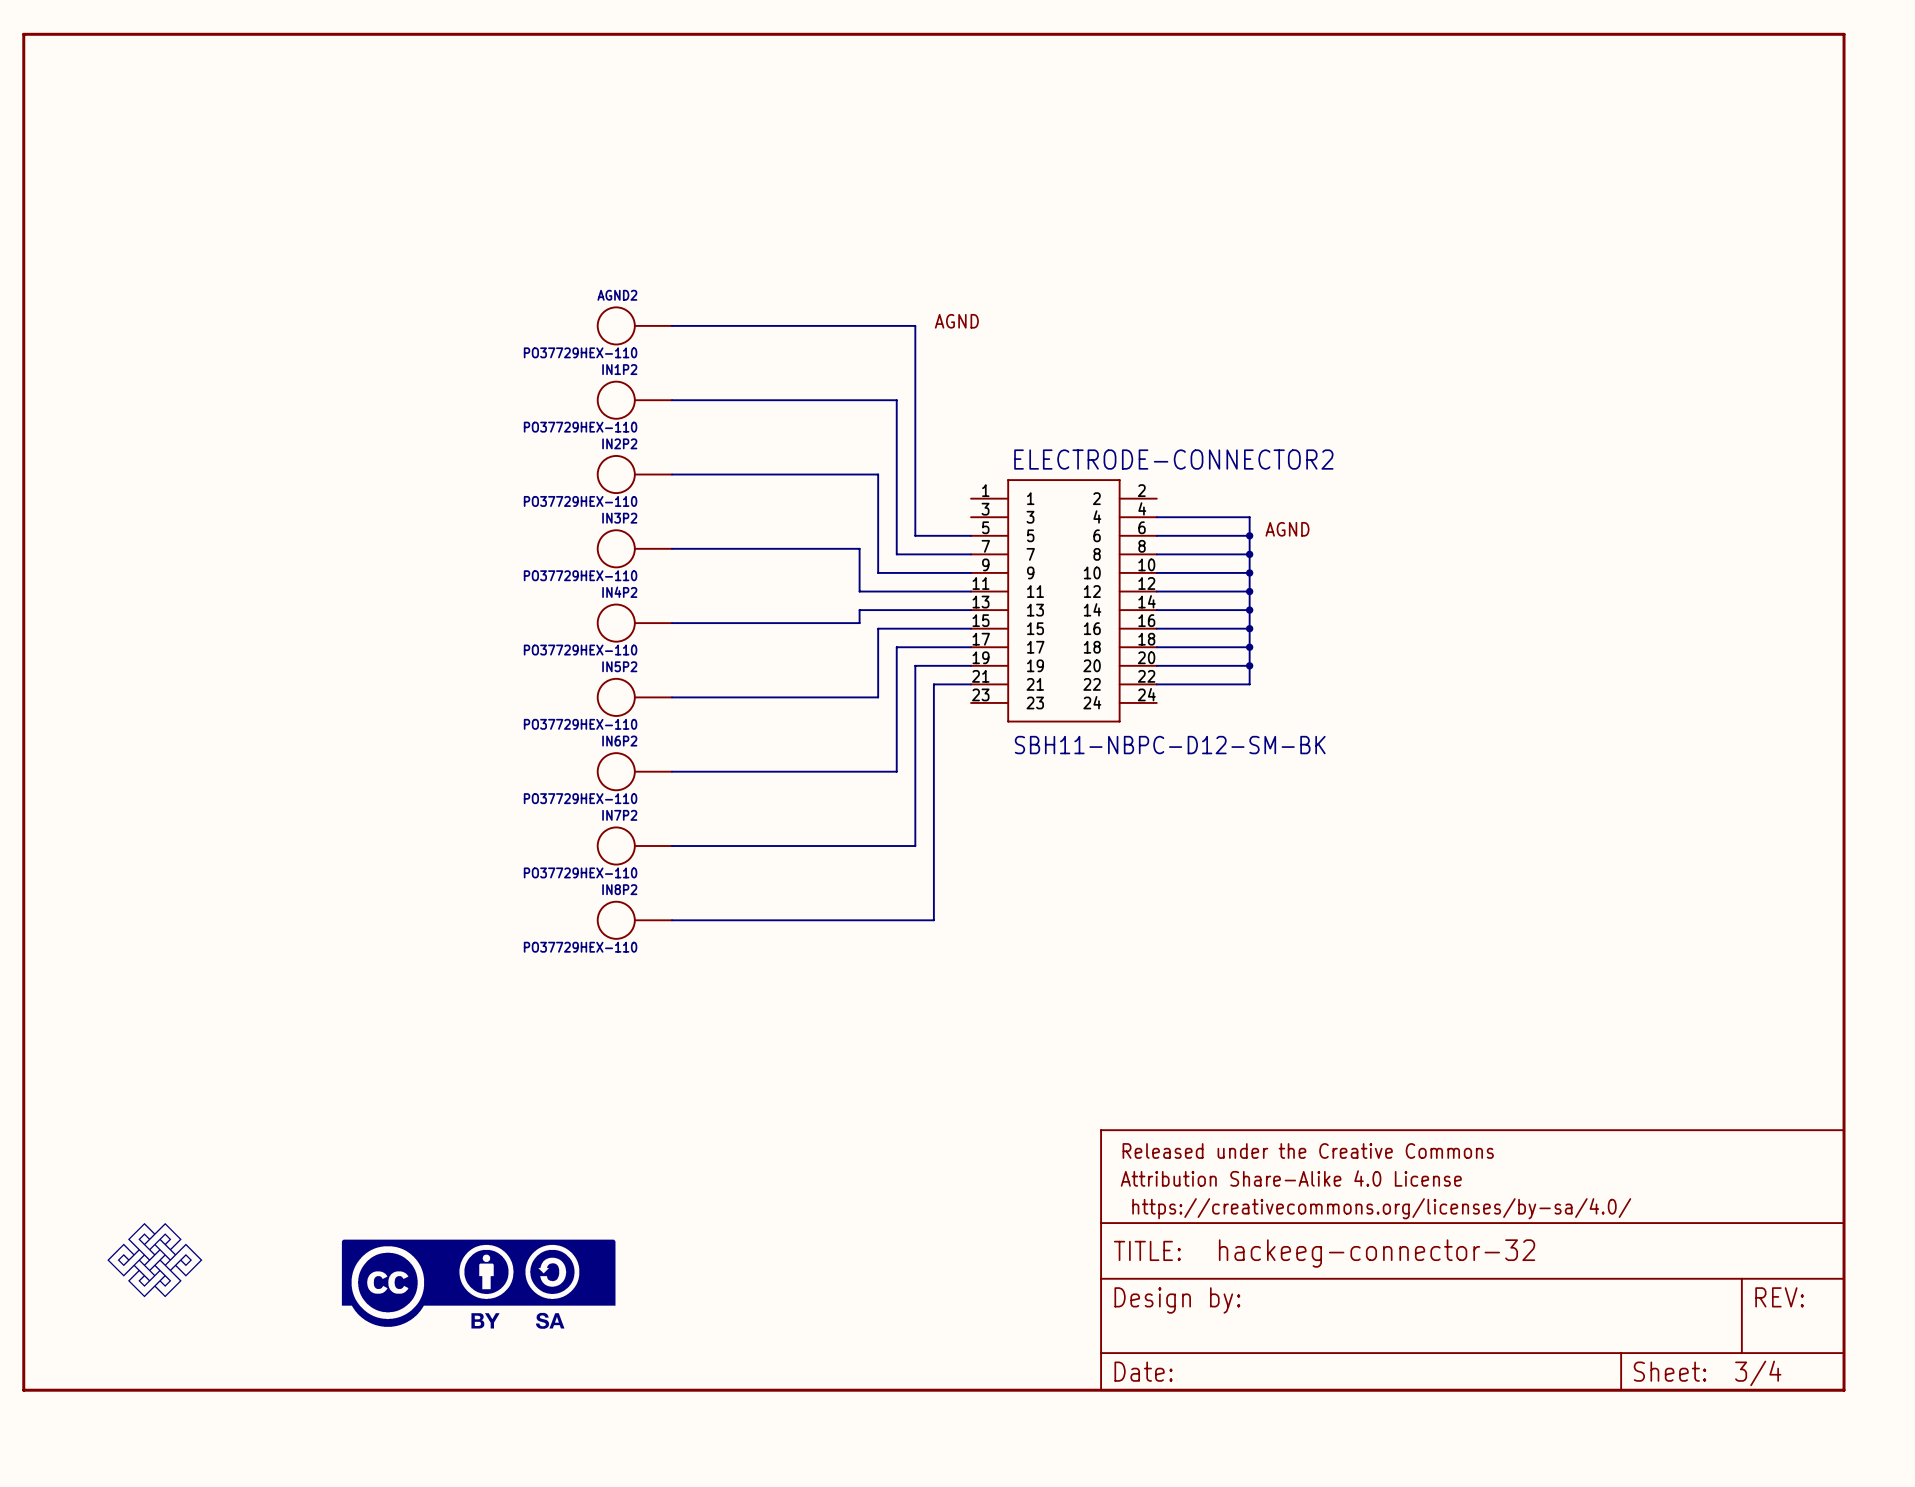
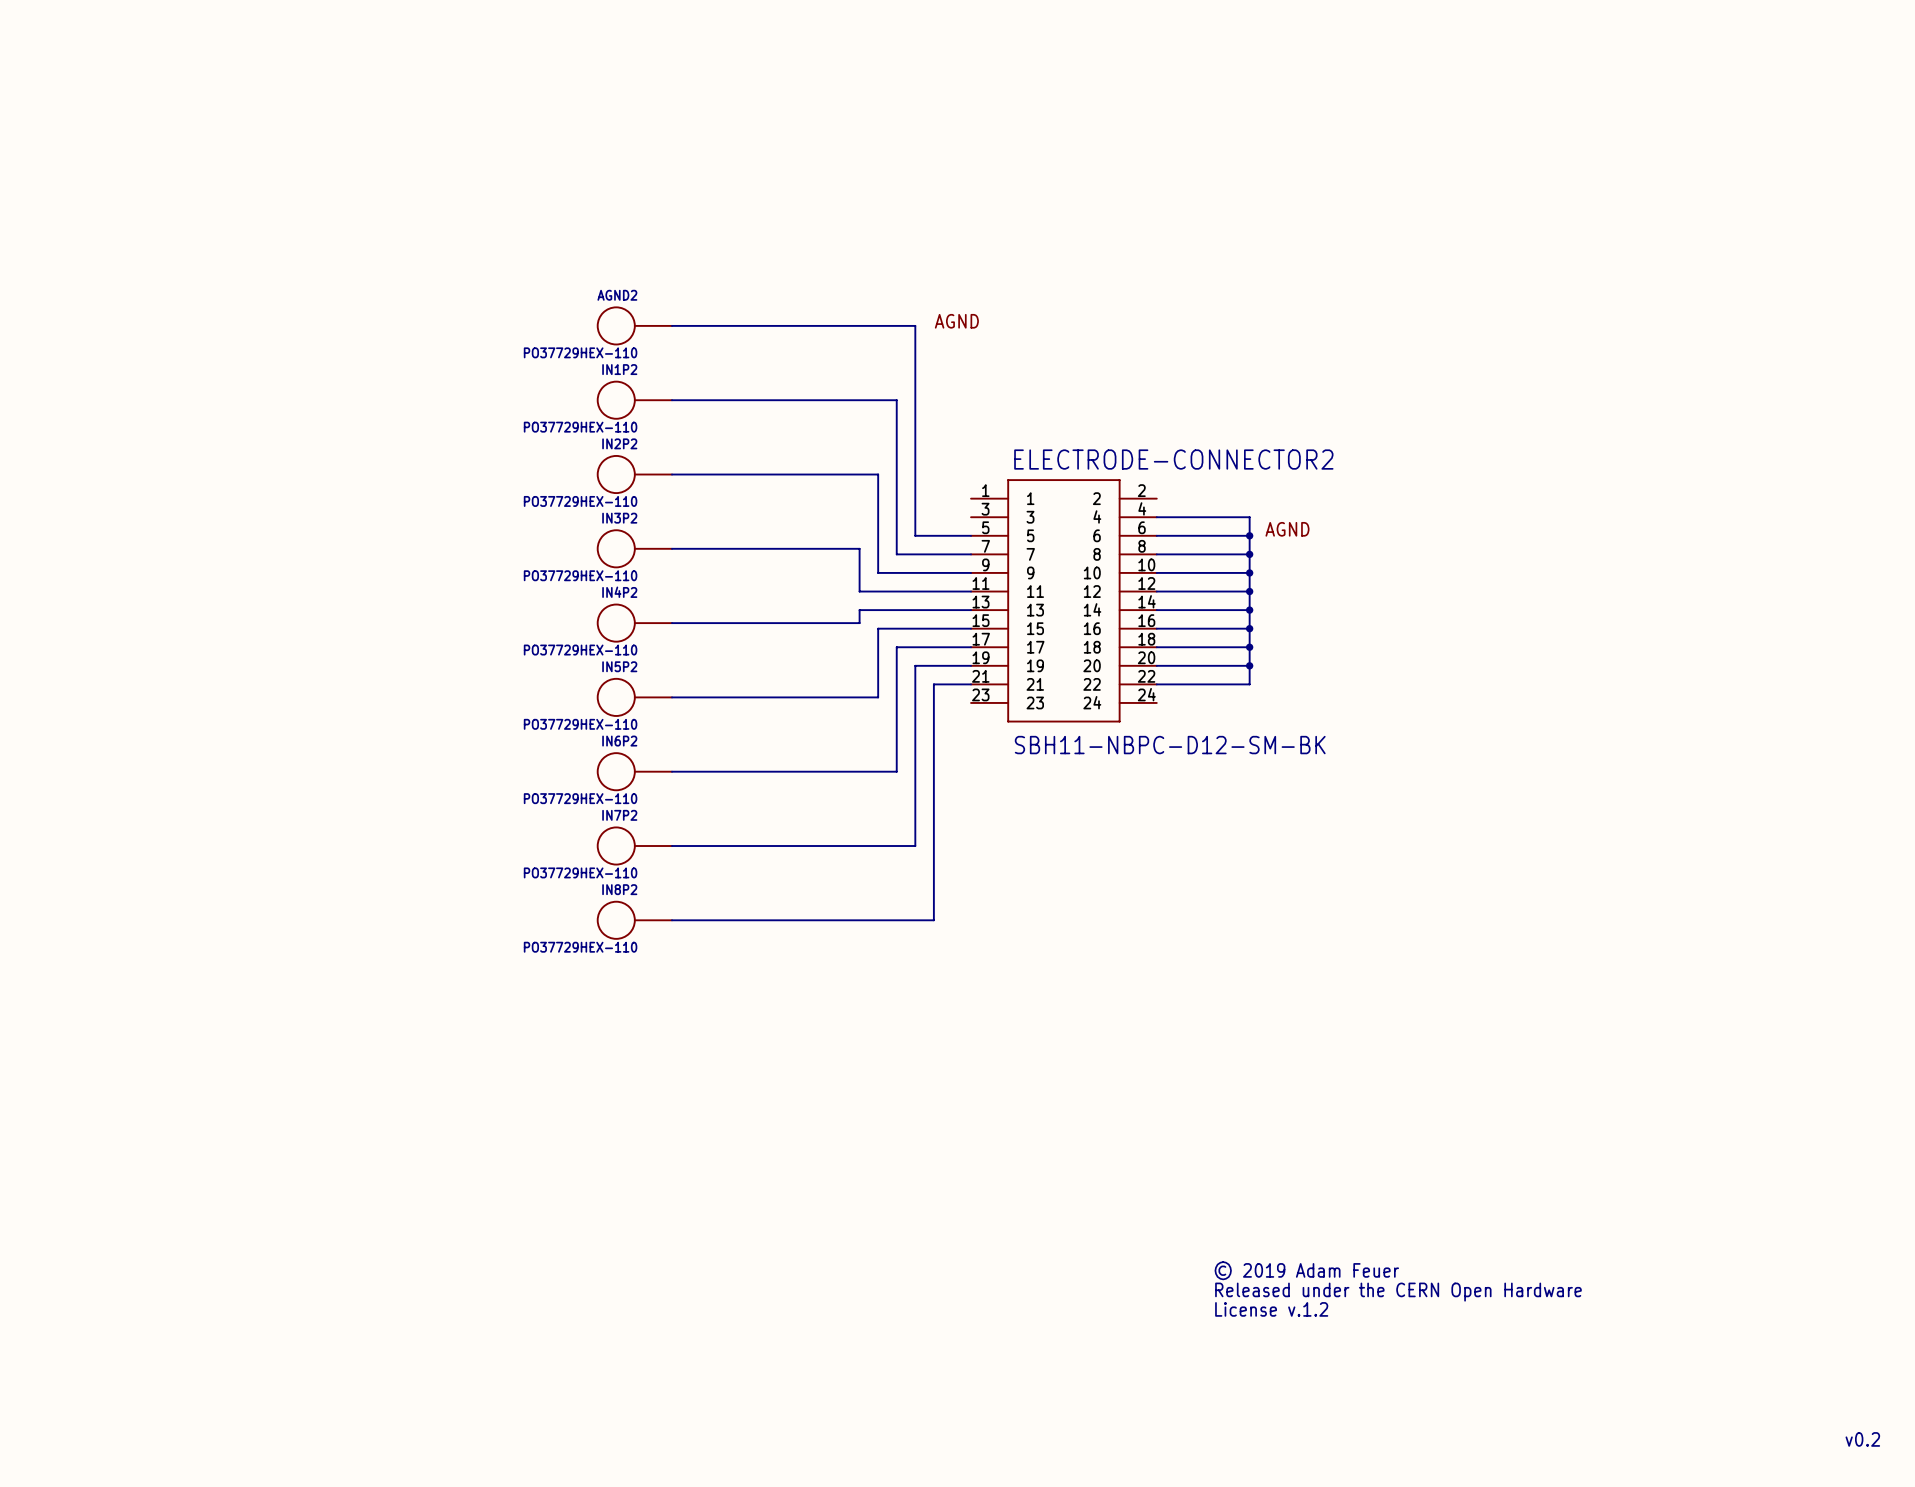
part: (933, 712) -> none
part: (154, 1260) -> none
part: (1472, 1260) -> none
text: none -> © 2019 Adam Feuer (1306, 1270)
part: (478, 1284) -> none
text: none -> Released under the CERN Open Hardware (1398, 1292)
text: none -> License v.1.2 (1271, 1309)
text: none -> v0.2 (1862, 1439)

